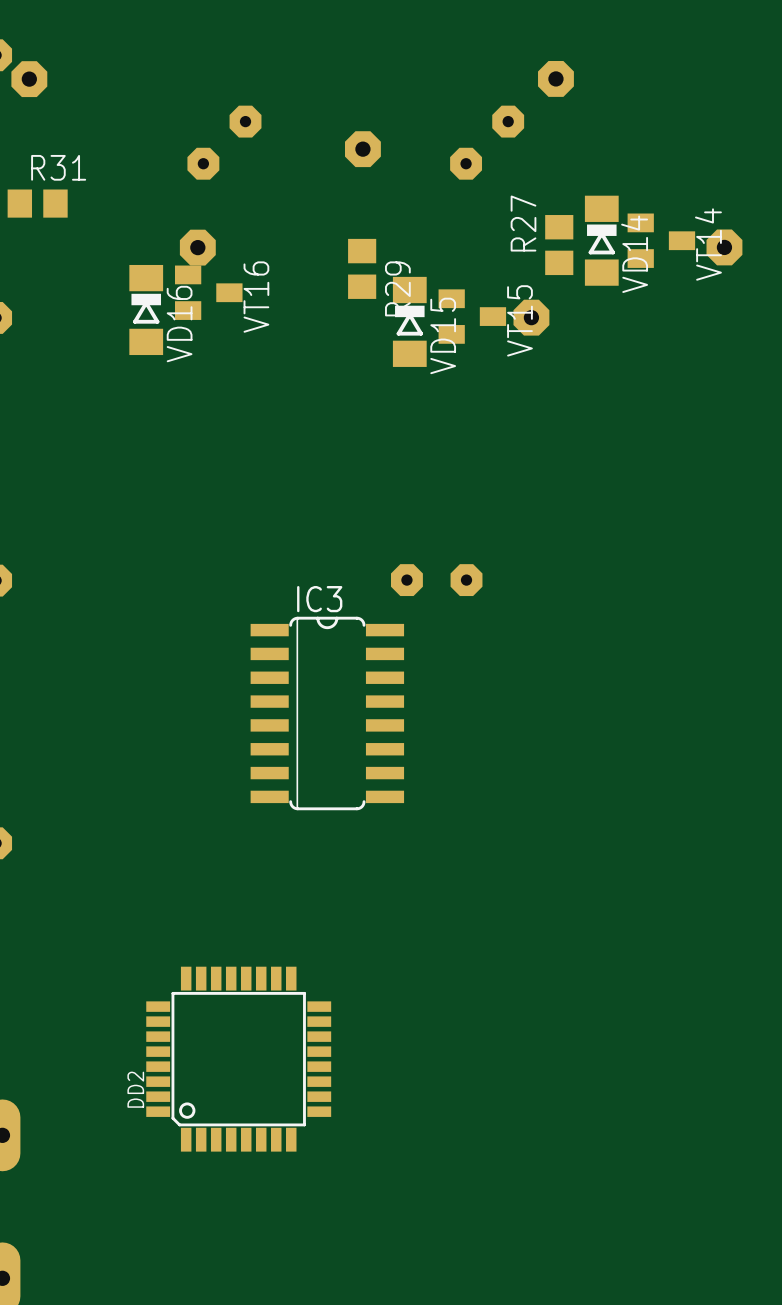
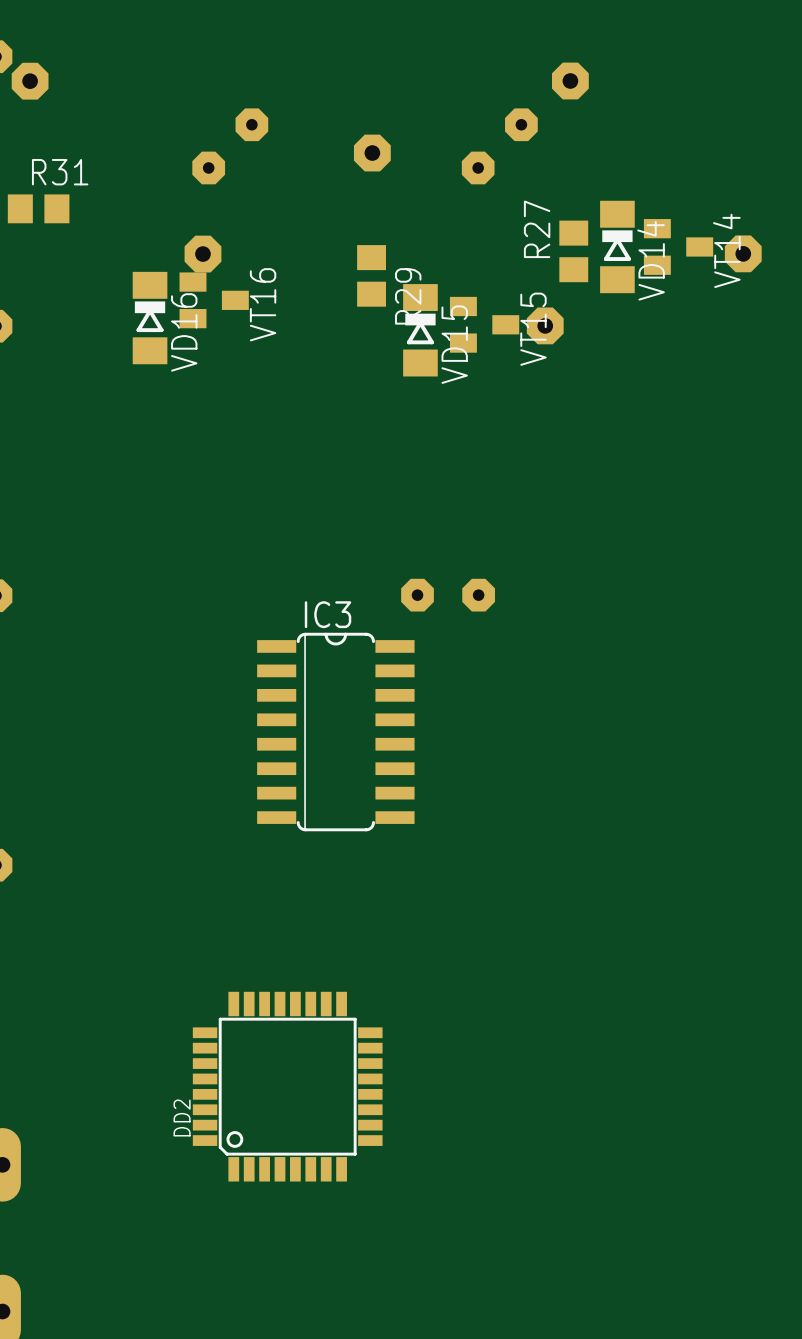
DD2 position: (238, 1059) -> (287, 1086)

